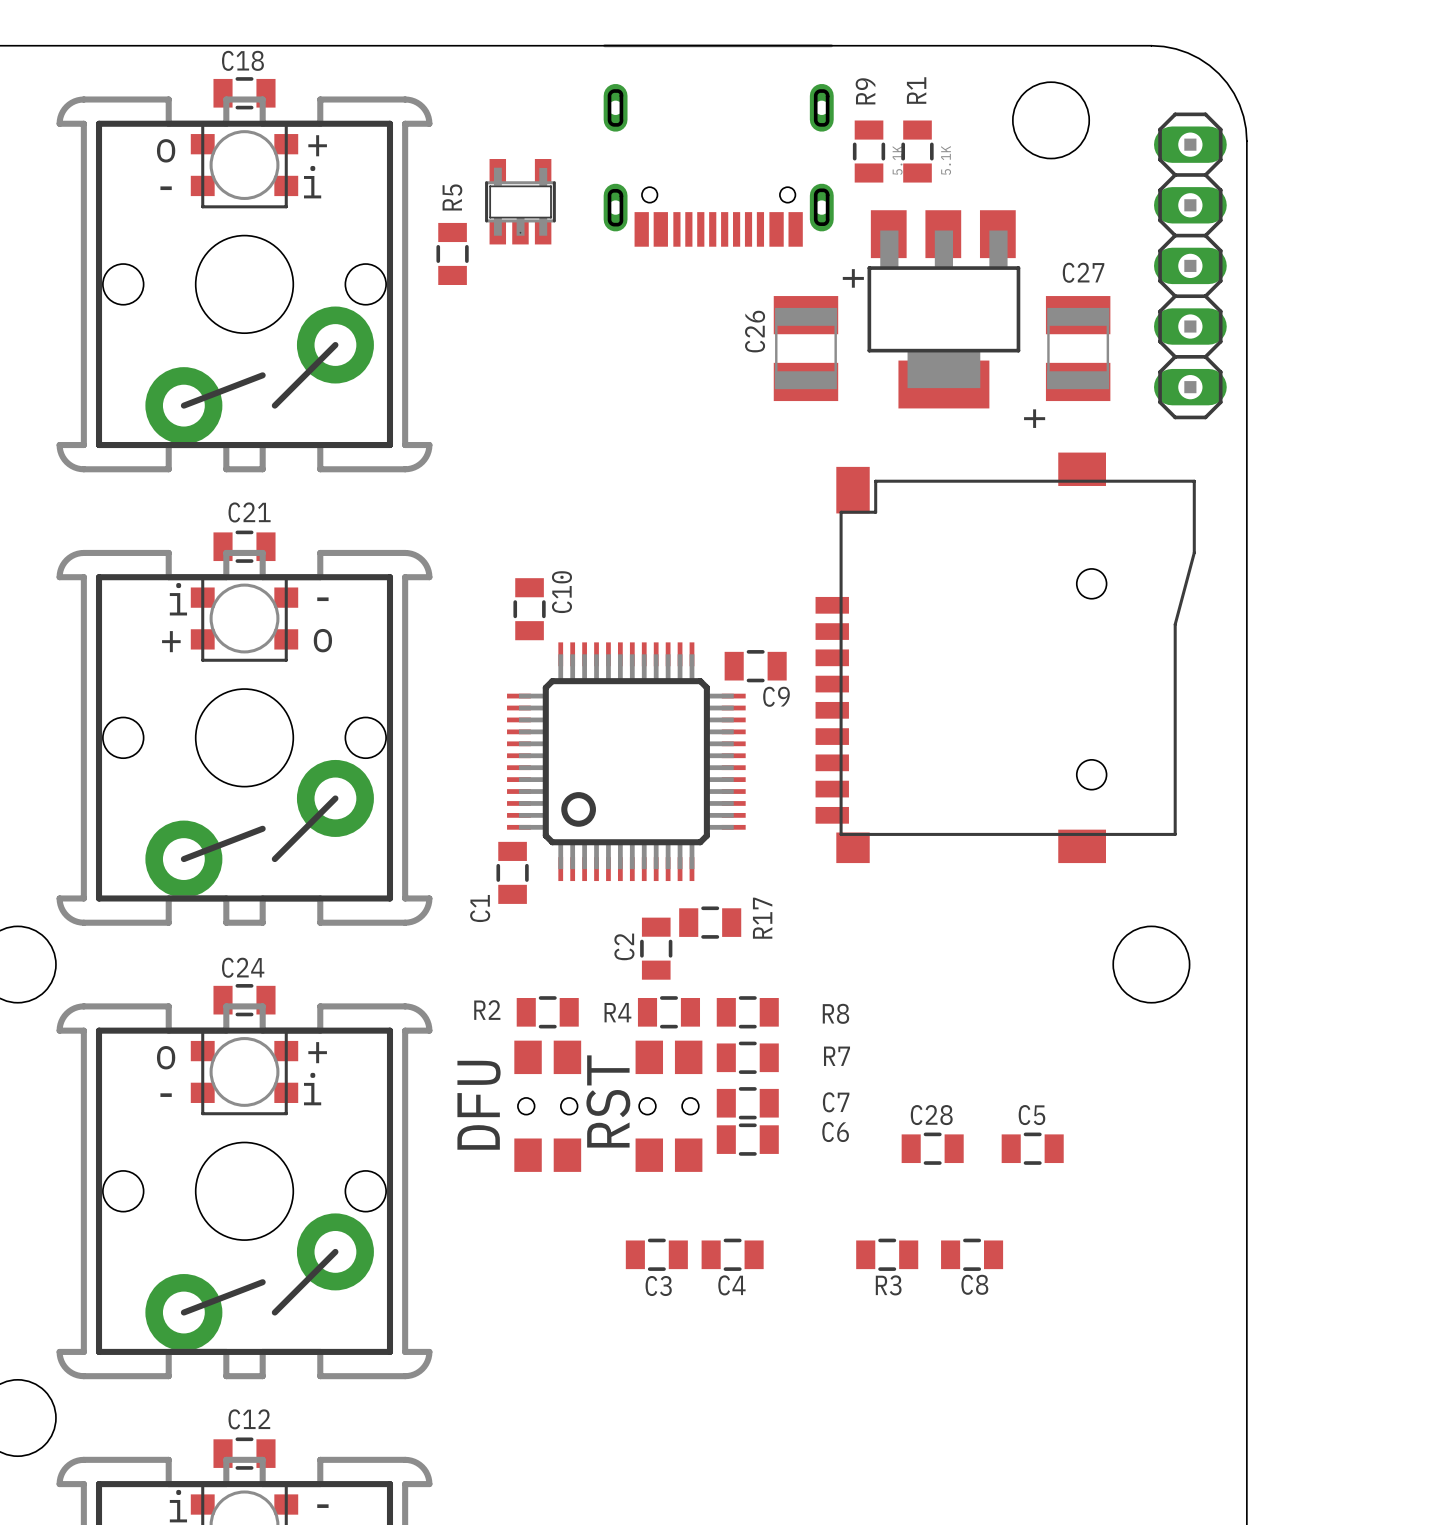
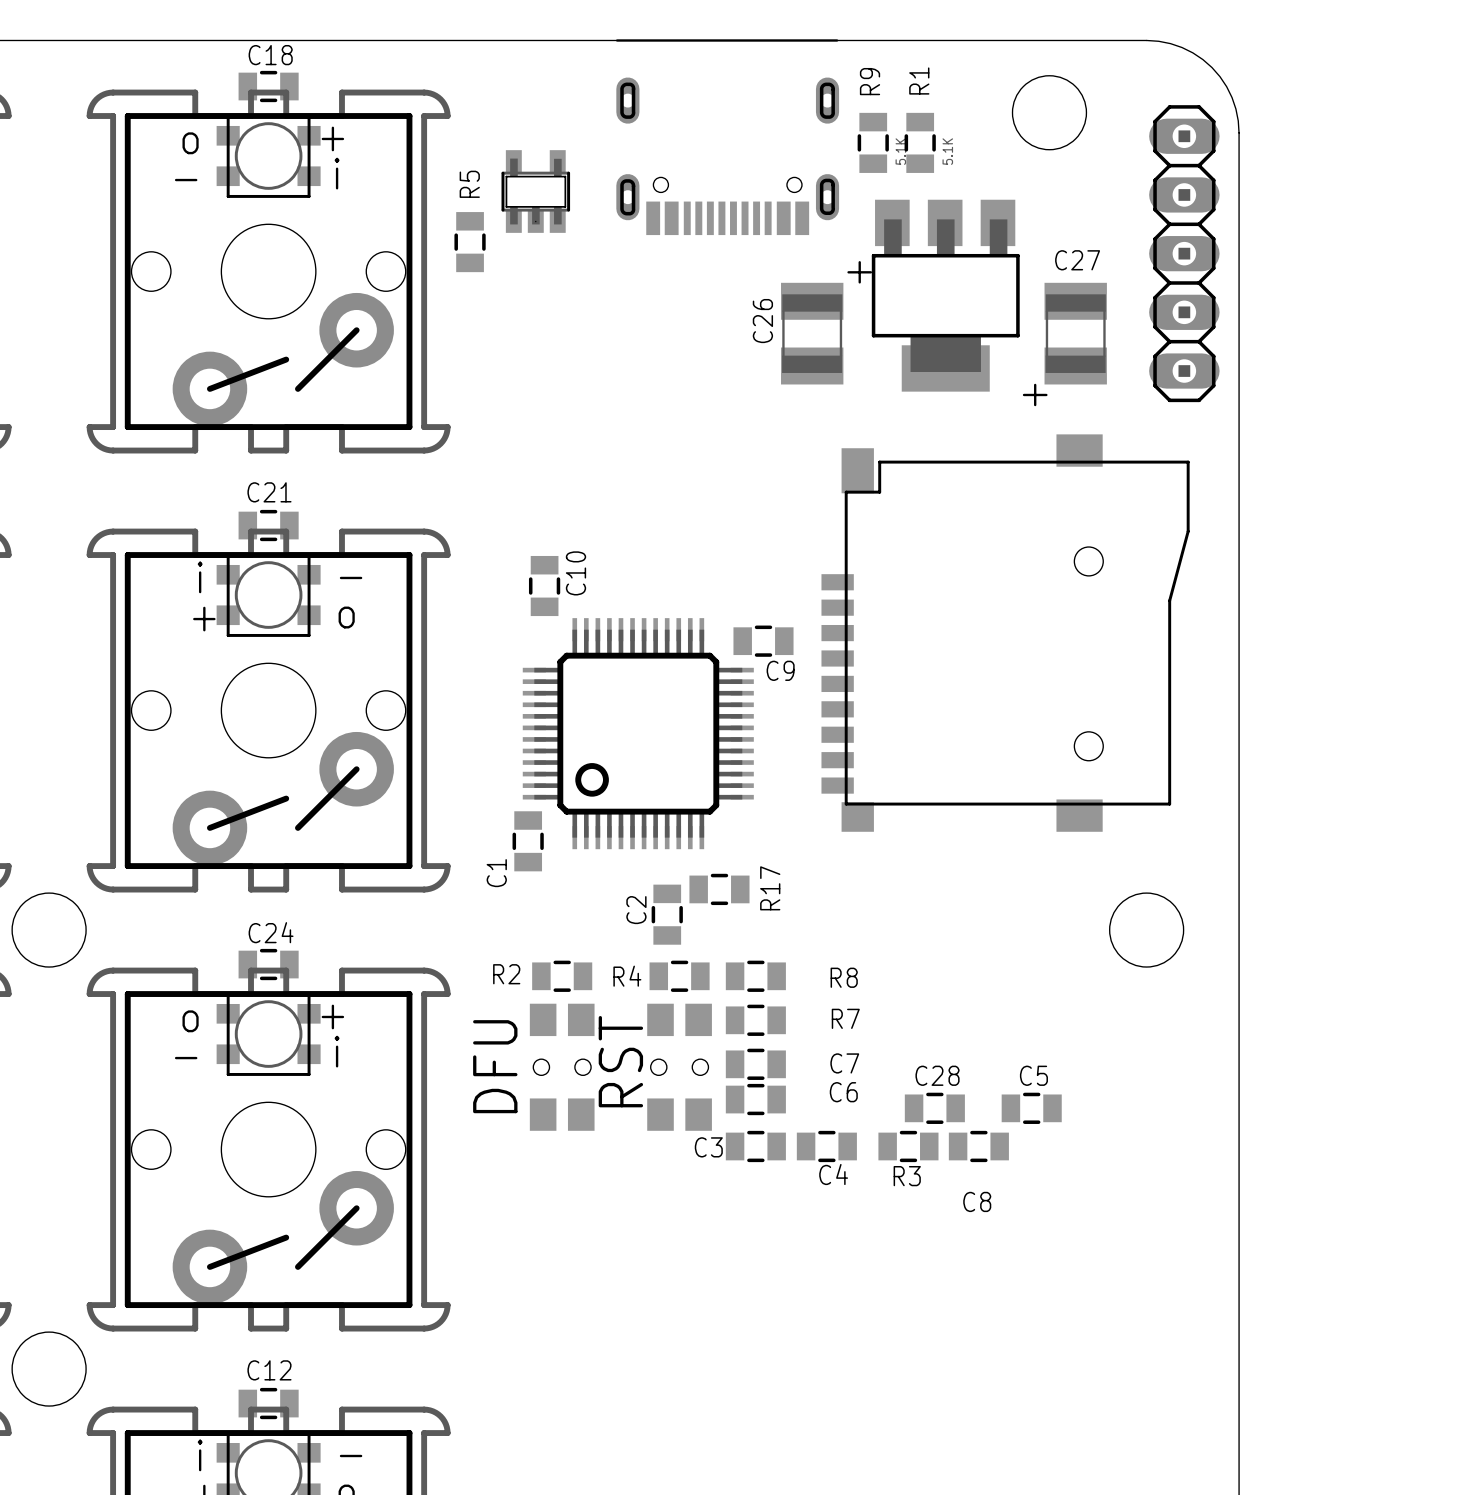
C3 position: (656, 1254) -> (755, 1146)
C4 position: (732, 1254) -> (826, 1146)
R3 position: (887, 1254) -> (908, 1146)
C8 position: (972, 1254) -> (978, 1146)
C8 name position: C8 (974, 1284) -> C8 (977, 1201)
C4 name position: C4 (731, 1285) -> C4 (833, 1174)
C3 name position: C3 (658, 1286) -> C3 (708, 1147)

